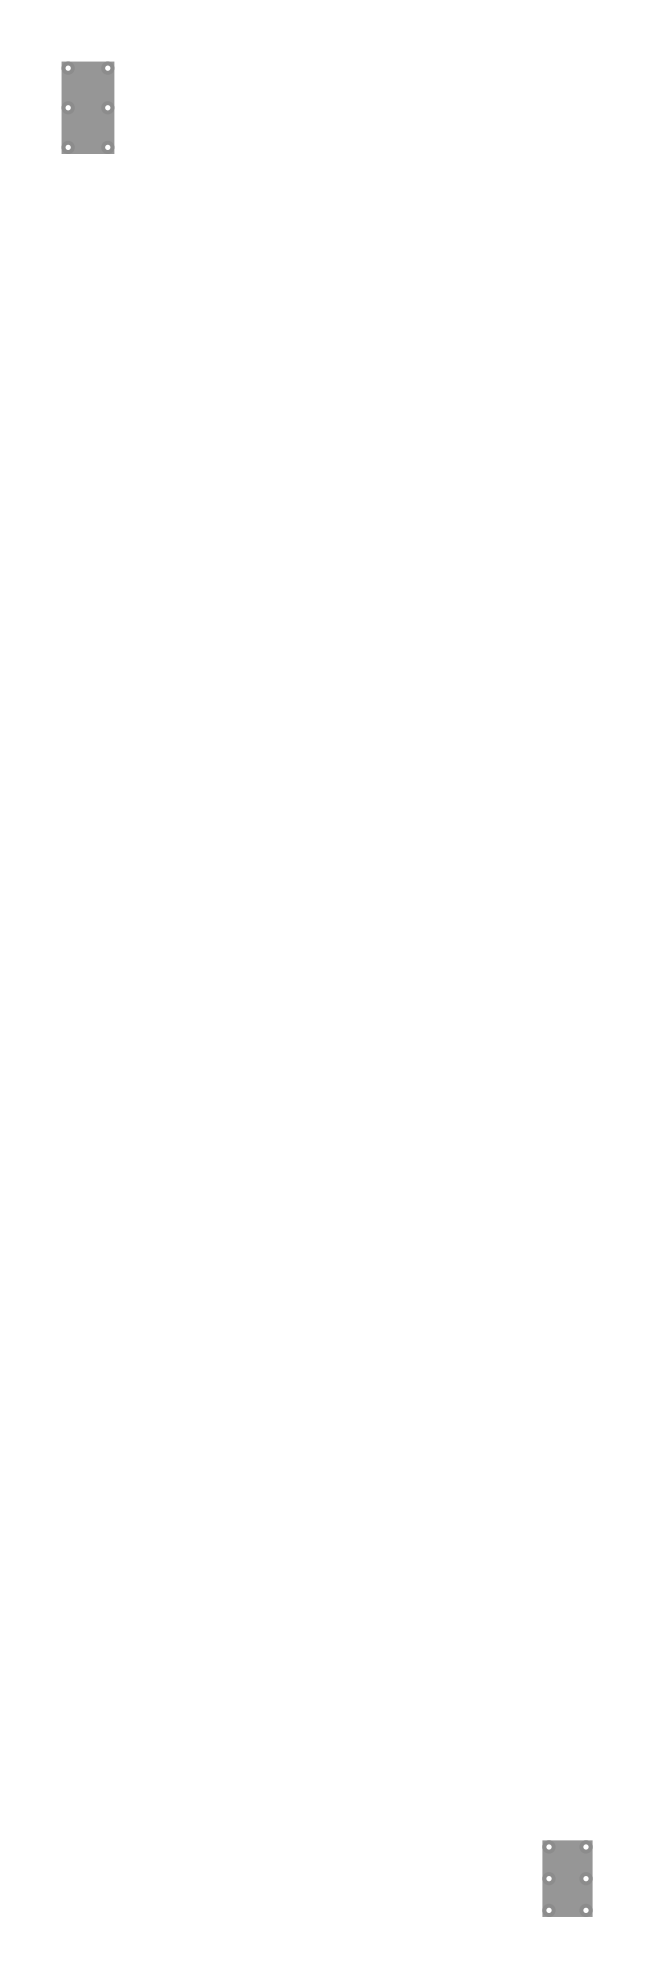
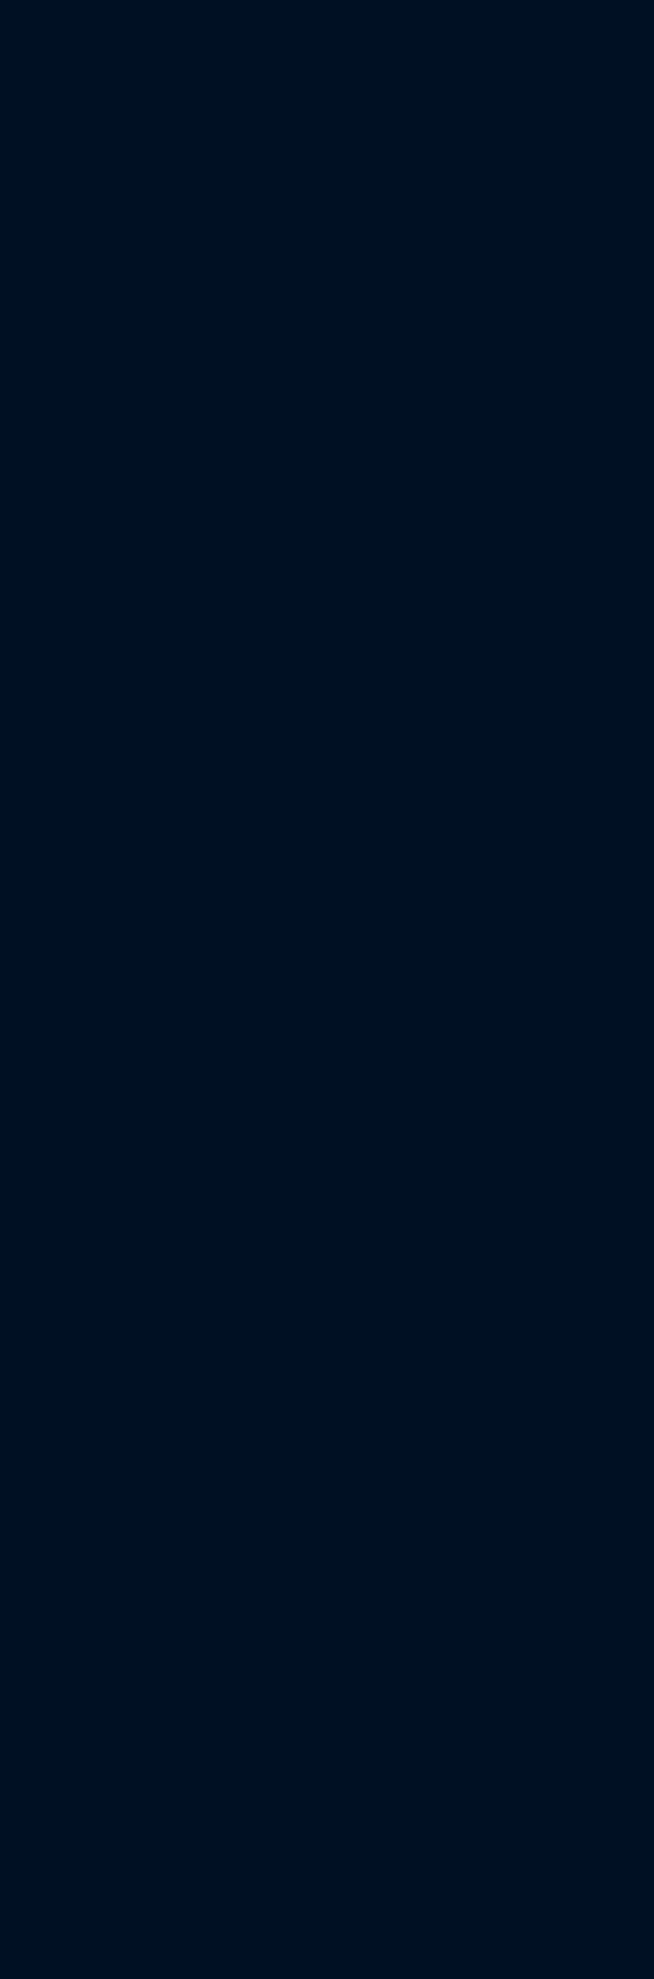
part: (87, 107) -> none
part: (567, 1878) -> none

